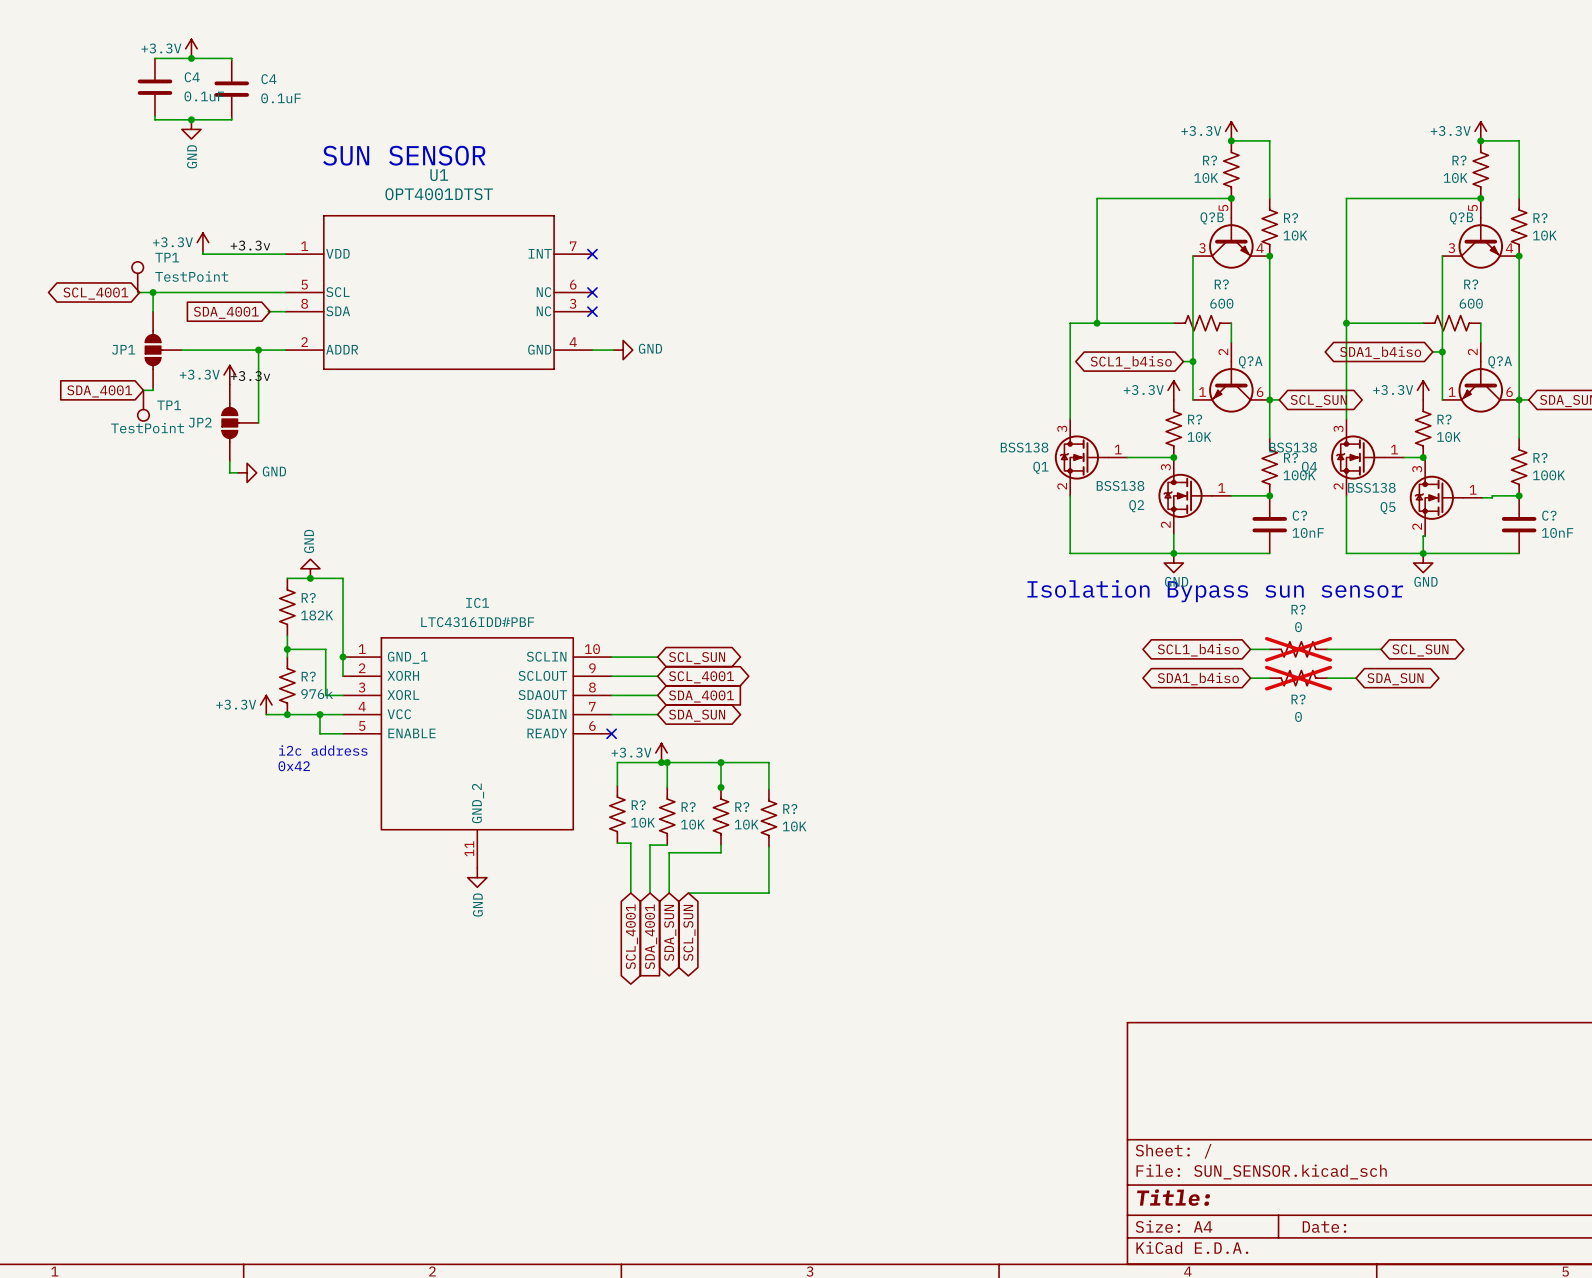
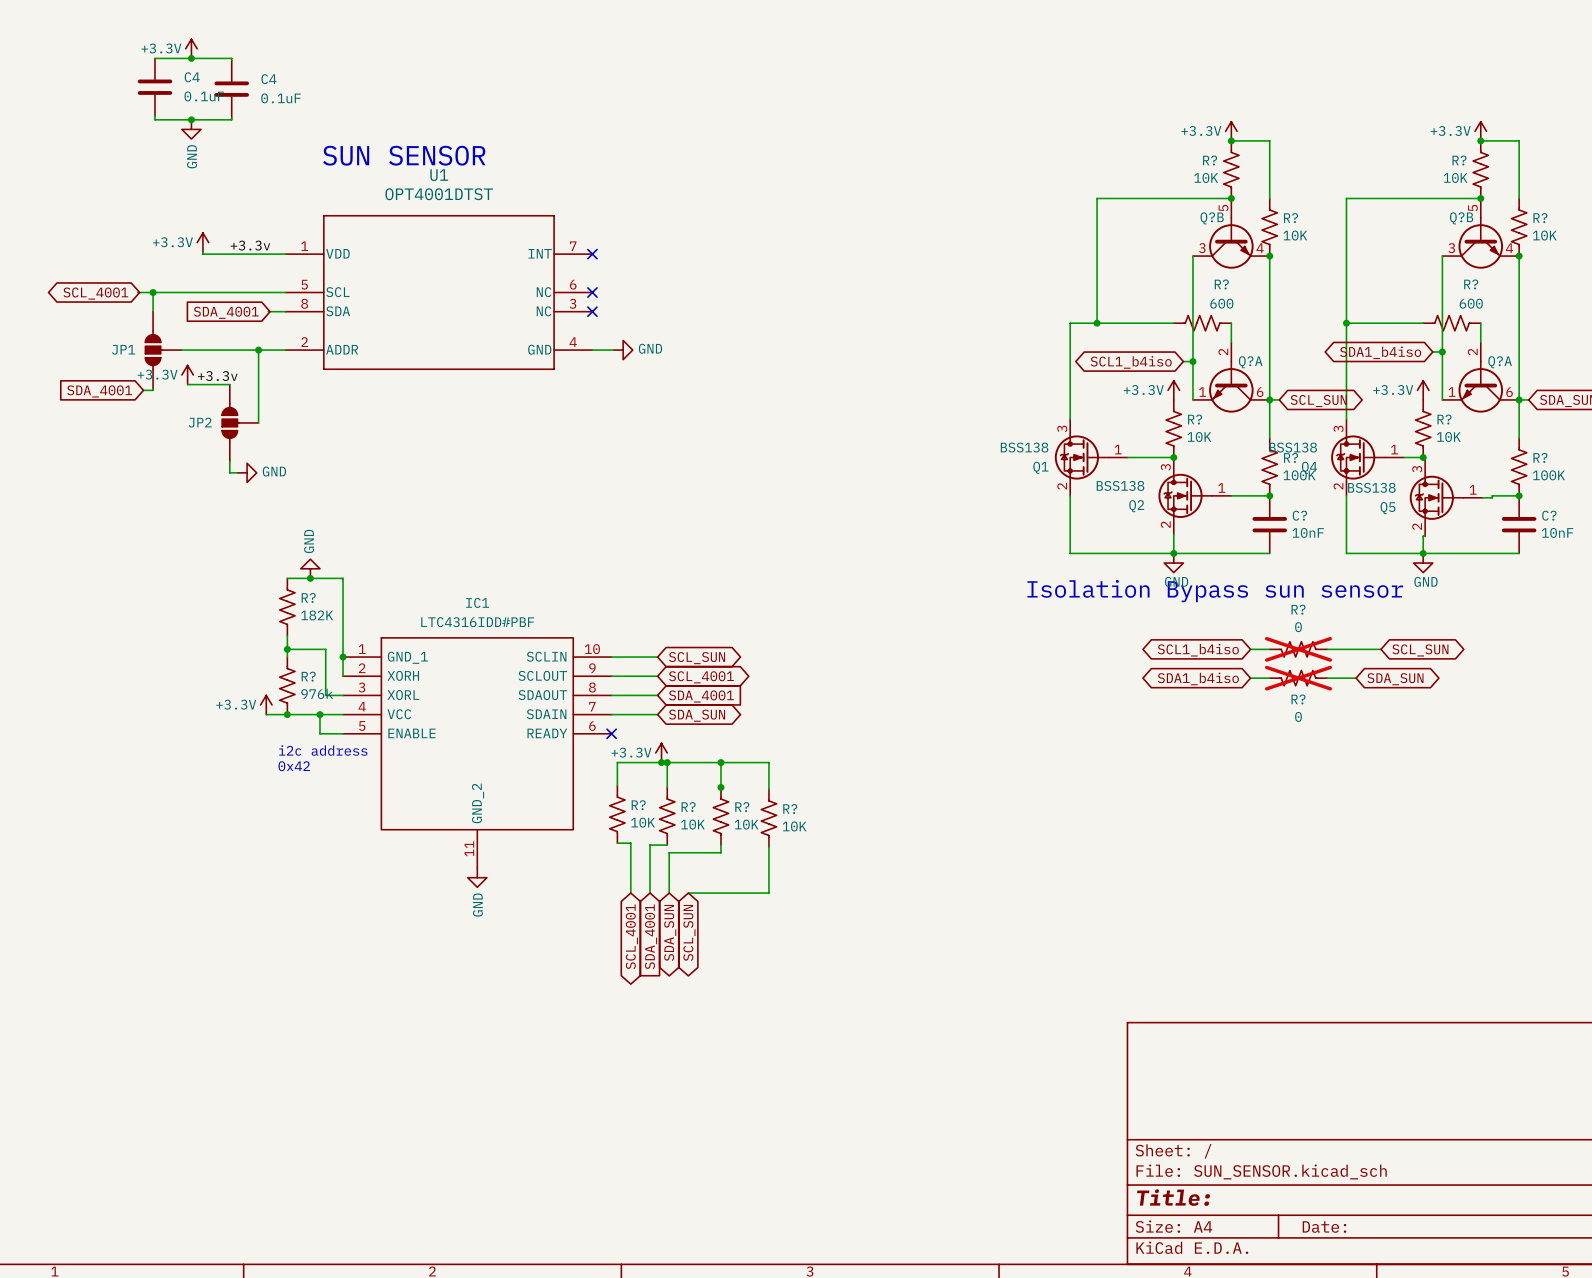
TP1: TestPoint (137, 277) -> none
power symbol position: +3.3V (229, 375) -> +3.3V (187, 375)
label position: +3.3v (250, 376) -> +3.3v (217, 376)
wire: none -> (187, 384) (229, 384)
TP1: TestPoint (143, 405) -> none

